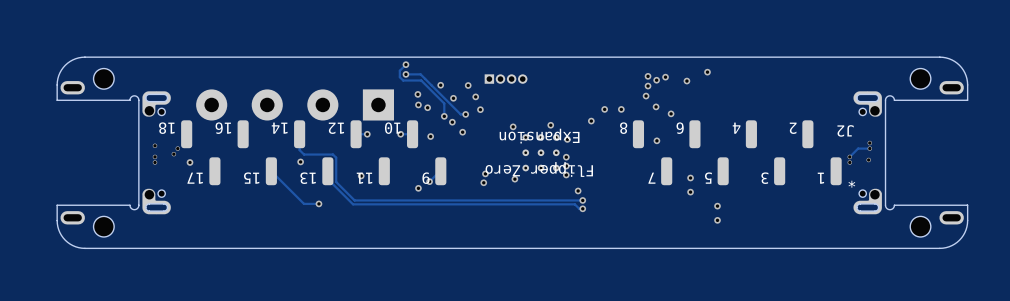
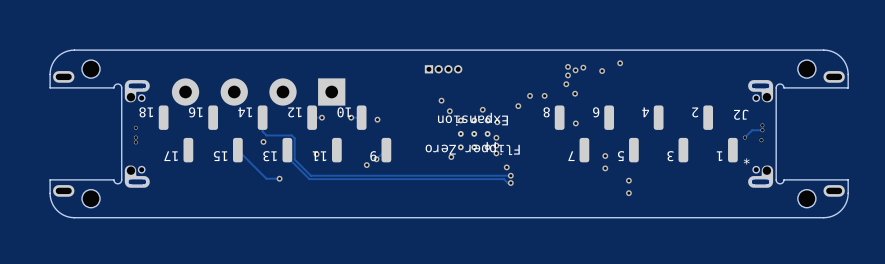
track: (405, 64) (399, 70) (399, 77) (403, 80) (421, 80) (444, 103) (444, 116) (442, 114) -> none
via: (405, 64) -> none
track: (405, 74) (420, 74) (460, 114) (465, 114) -> none
via: (405, 74) -> none
via: (440, 85) -> none
via: (468, 85) -> none
via: (417, 94) -> none
via: (475, 96) -> none
via: (453, 98) -> none
via: (418, 104) -> none
via: (427, 107) -> none
via: (480, 109) -> none
via: (671, 113) -> none
via: (465, 114) -> none
via: none -> (441, 100)
via: (444, 116) -> none
via: (452, 122) -> none
via: (462, 132) -> none
via: (177, 148) -> none
via: (173, 154) -> none
via: (190, 162) -> none
via: (849, 162) -> none
via: (485, 173) -> none
via: (483, 182) -> none

